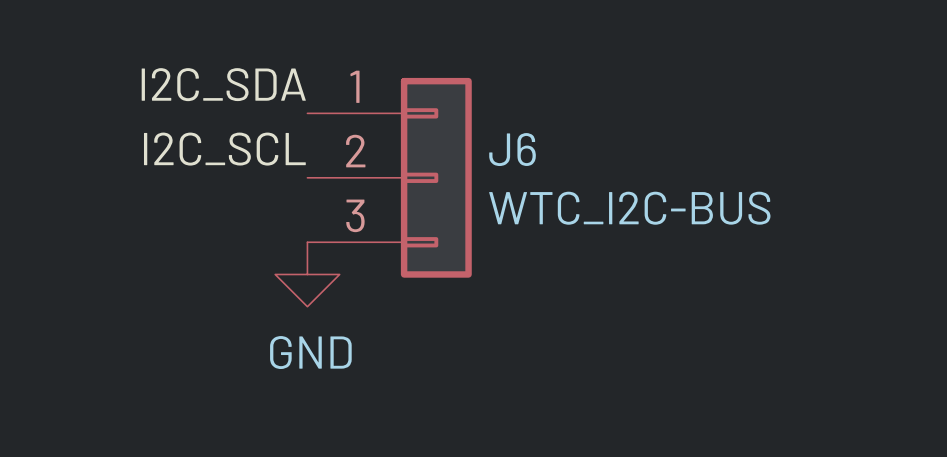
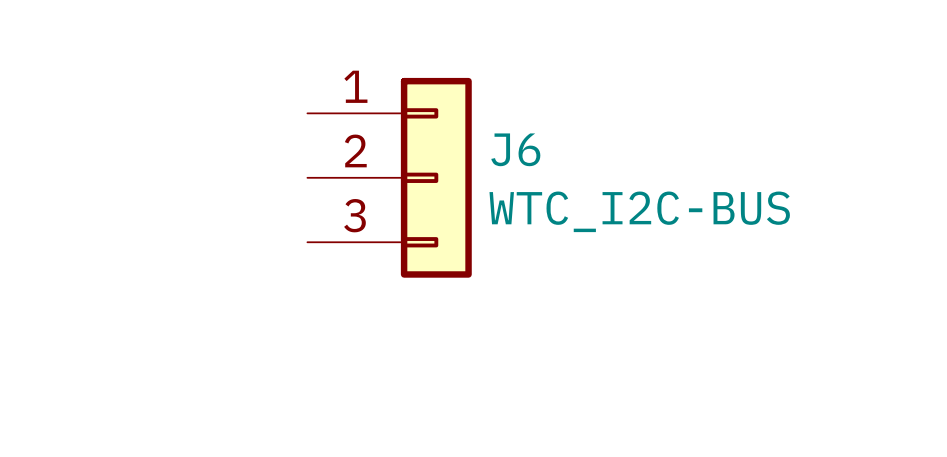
label: I2C_SDA (223, 84) -> none
label: I2C_SCL (224, 149) -> none
power symbol: GND (307, 274) -> none

